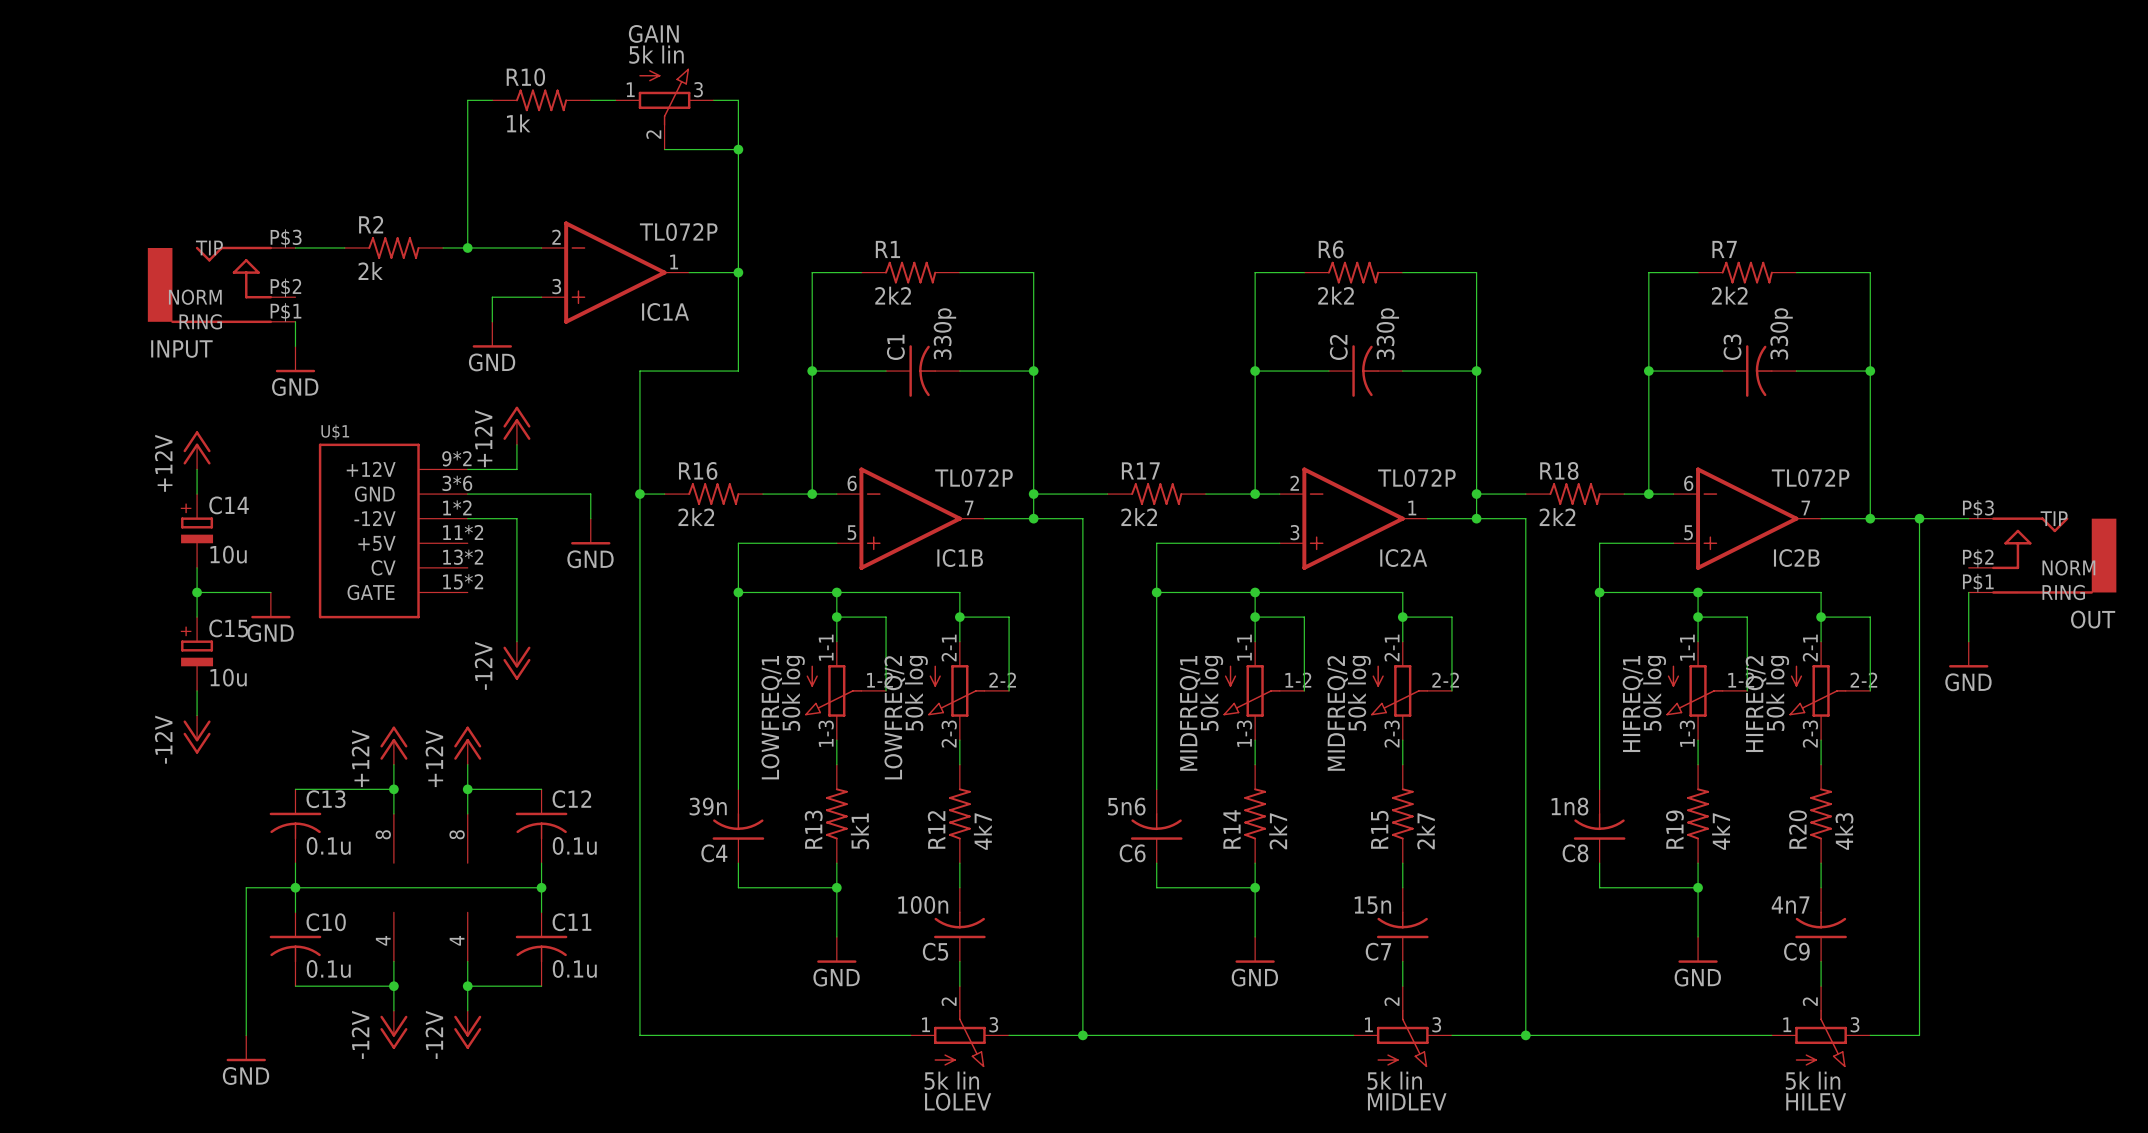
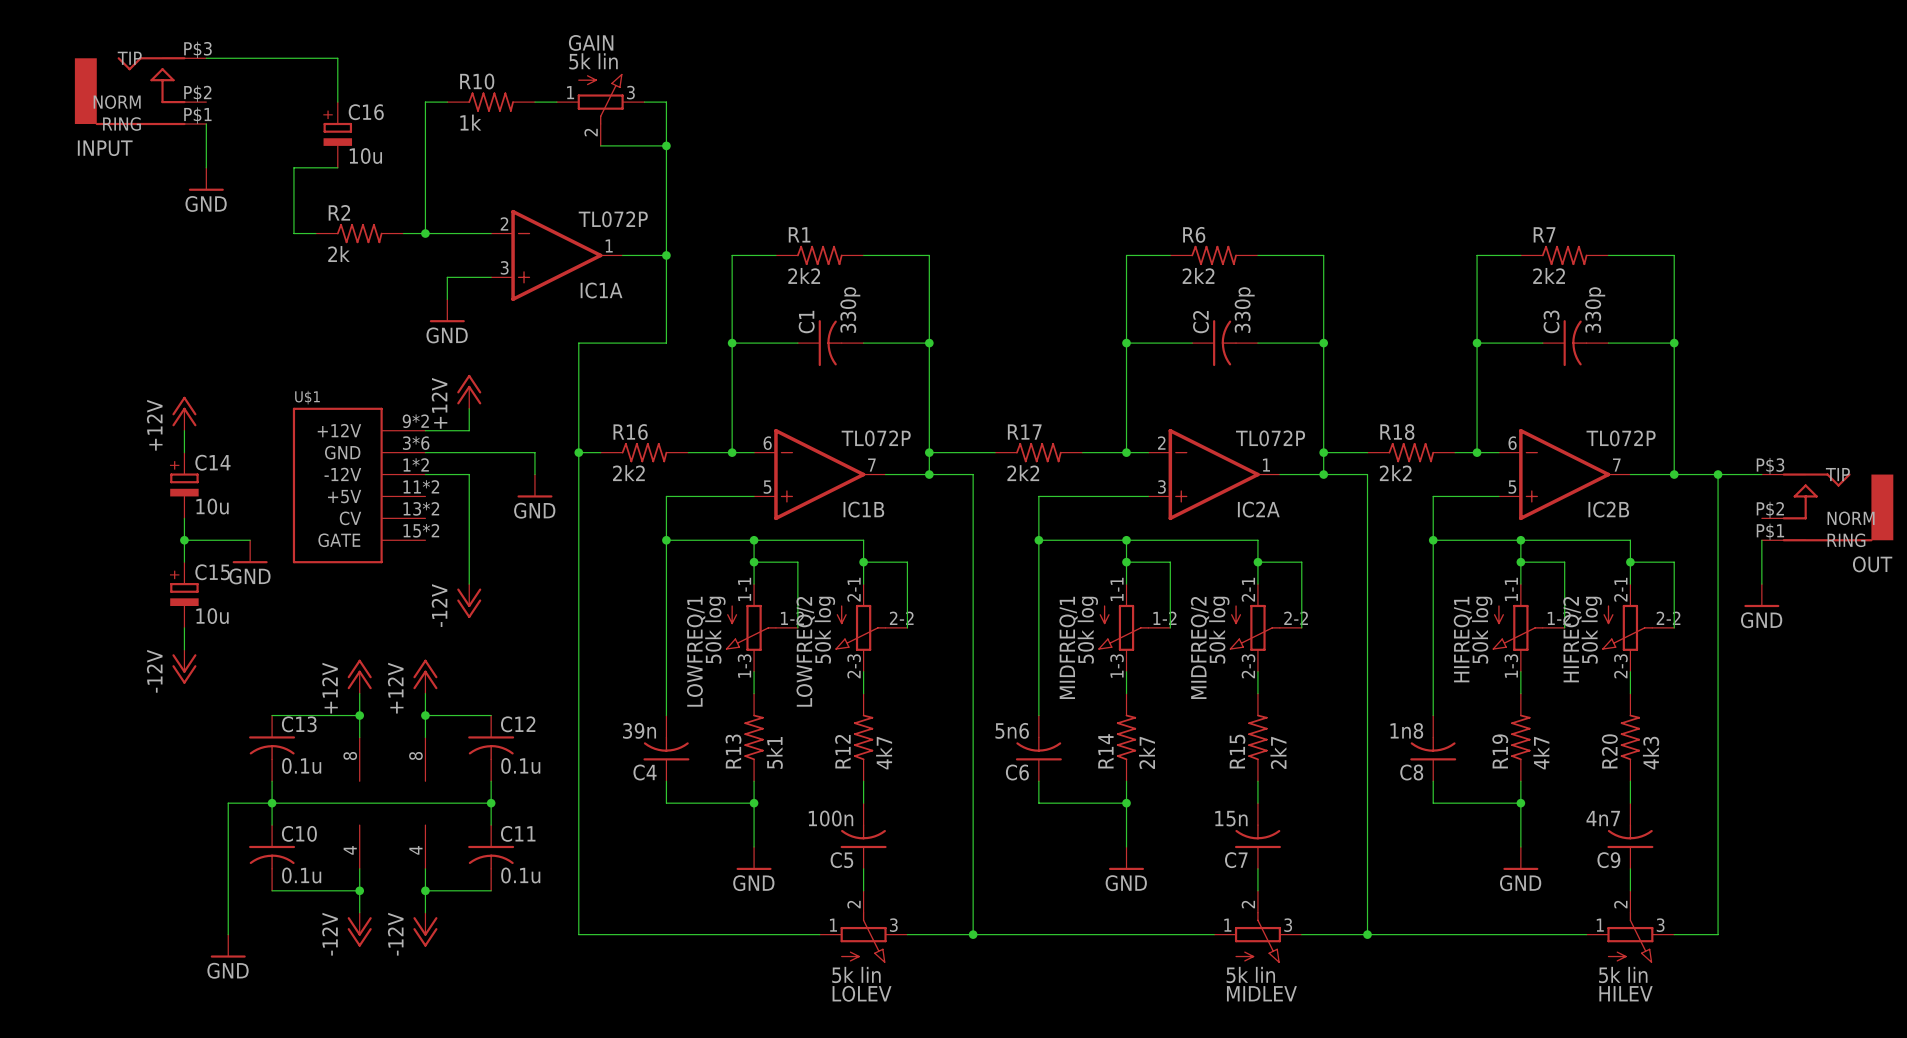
wire: none -> (206, 58) (337, 58) (337, 102)
wire: none -> (206, 124) (206, 167)
C16: none -> 10u (337, 134)
wire: (295, 247) (320, 247) -> (337, 167) (293, 167) (293, 233)
INPUT position: (221, 284) -> (140, 91)
wire: (295, 321) (295, 346) -> none
power symbol position: GND (295, 359) -> GND (206, 179)

